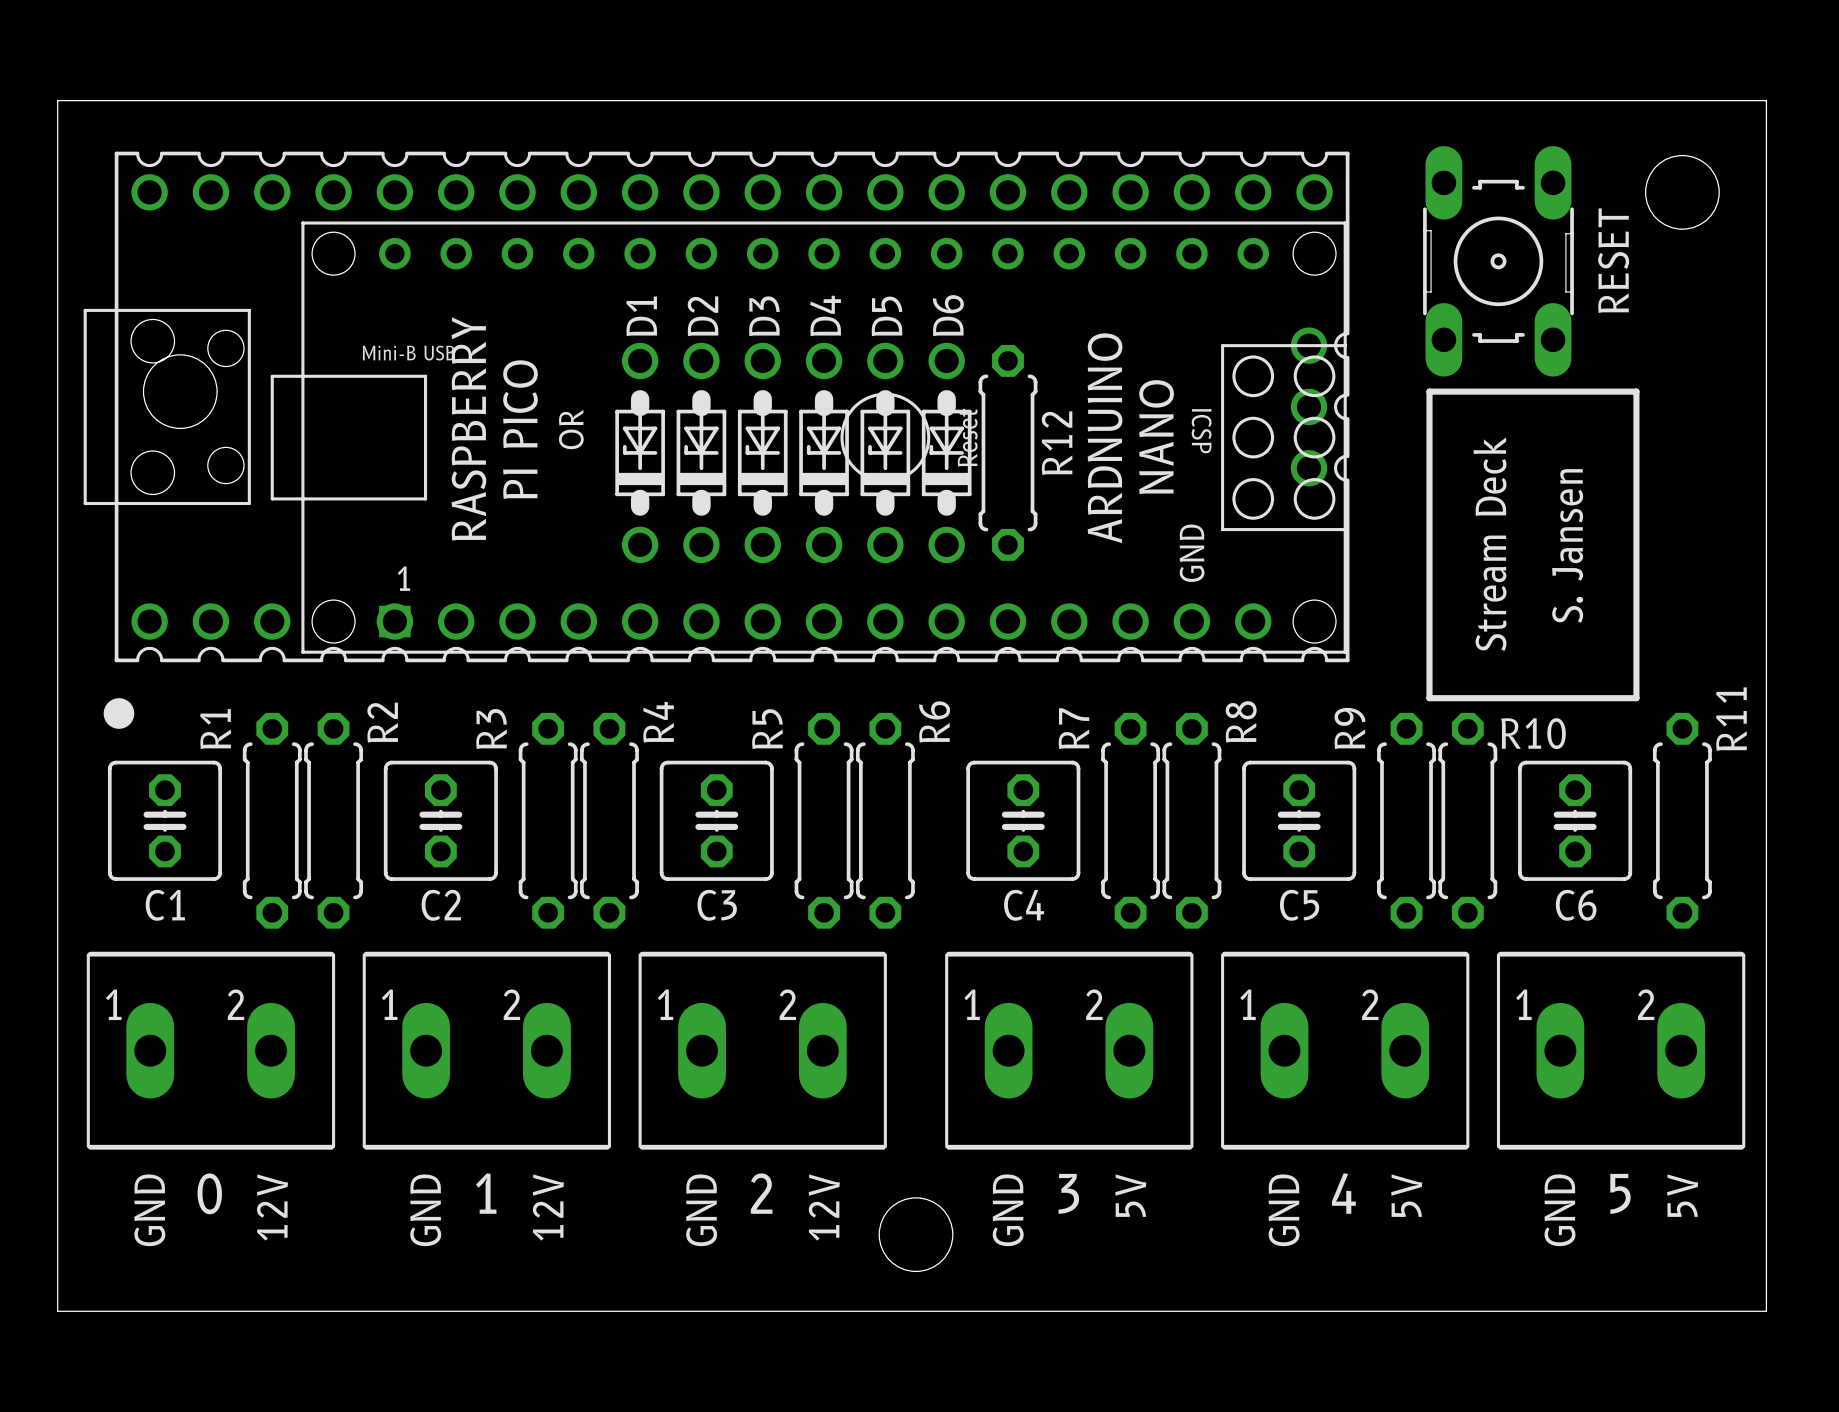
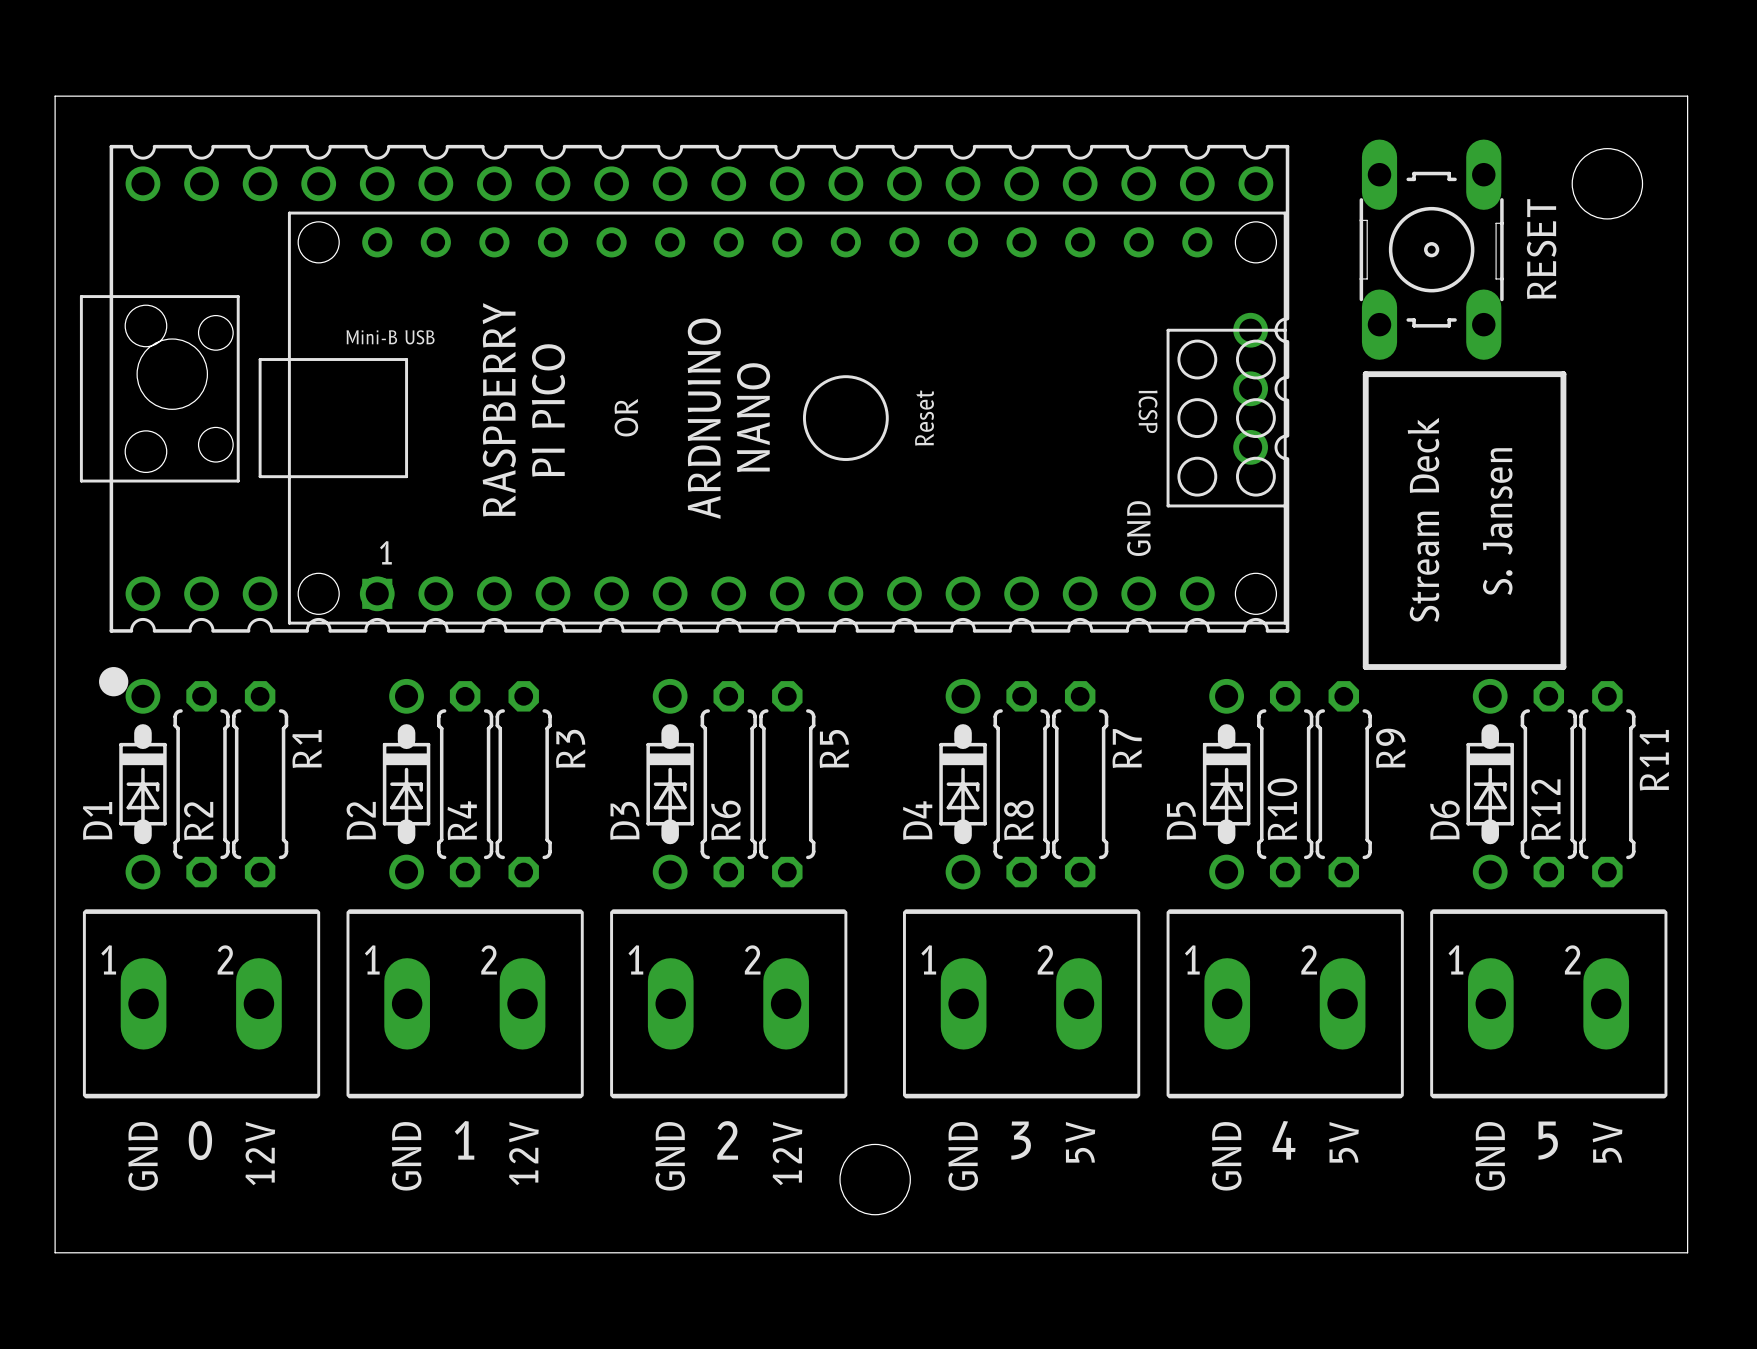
D4 name position: D4 (825, 315) -> D4 (917, 820)
D6 name position: D6 (948, 315) -> D6 (1445, 820)
D1 name position: D1 (641, 316) -> D1 (97, 820)
D2 name position: D2 (703, 316) -> D2 (361, 820)
D3 name position: D3 (764, 316) -> D3 (624, 820)
D5 name position: D5 (886, 316) -> D5 (1181, 820)
text: RASPBERRY (468, 428) -> none
text: PI PICO (520, 429) -> RASPBERRY (499, 409)
text position: OR (571, 429) -> OR (626, 417)
text: none -> PI PICO (548, 410)
text position: NANO (1156, 437) -> NANO (753, 417)
text position: ARDNUINO (1105, 438) -> ARDNUINO (704, 418)
R12 name position: R12 (1057, 443) -> R12 (1545, 809)
D1 rotation: 0° (640, 452) -> 180° (142, 784)
D1 position: (640, 452) -> (142, 784)
D2 rotation: 0° (701, 452) -> 180° (406, 784)
D2 position: (701, 452) -> (406, 784)
D3 rotation: 0° (762, 452) -> 180° (670, 784)
D3 position: (762, 452) -> (670, 784)
D4 rotation: 0° (824, 452) -> 180° (963, 784)
D4 position: (824, 452) -> (963, 784)
D5 rotation: 0° (885, 452) -> 180° (1226, 784)
D5 position: (885, 452) -> (1226, 784)
D6 rotation: 0° (946, 452) -> 180° (1490, 784)
D6 position: (946, 452) -> (1490, 784)
R12 position: (1007, 452) -> (1548, 784)
R11 name position: R11 (1731, 719) -> R11 (1654, 760)
R6 name position: R6 (934, 721) -> R6 (725, 820)
R8 name position: R8 (1241, 721) -> R8 (1018, 820)
R2 name position: R2 (382, 722) -> R2 (198, 820)
R4 name position: R4 (658, 722) -> R4 (462, 820)
R7 name position: R7 (1073, 728) -> R7 (1127, 748)
R9 name position: R9 (1350, 728) -> R9 (1390, 748)
R1 name position: R1 (215, 729) -> R1 (306, 748)
R3 name position: R3 (491, 729) -> R3 (570, 748)
R5 name position: R5 (767, 729) -> R5 (834, 748)
R10 name rotation: 0° (1533, 733) -> 90° counterclockwise (1282, 809)
R10 name position: R10 (1533, 733) -> R10 (1282, 809)
C1: (164, 820) -> none
R2 position: (333, 820) -> (201, 784)
C2: (440, 820) -> none
R4 position: (609, 820) -> (465, 784)
C3: (716, 820) -> none
R6 position: (885, 820) -> (728, 784)
C4: (1023, 820) -> none
R8 position: (1191, 820) -> (1021, 784)
C5: (1299, 820) -> none
R10 position: (1467, 820) -> (1285, 784)
C6: (1575, 820) -> none

